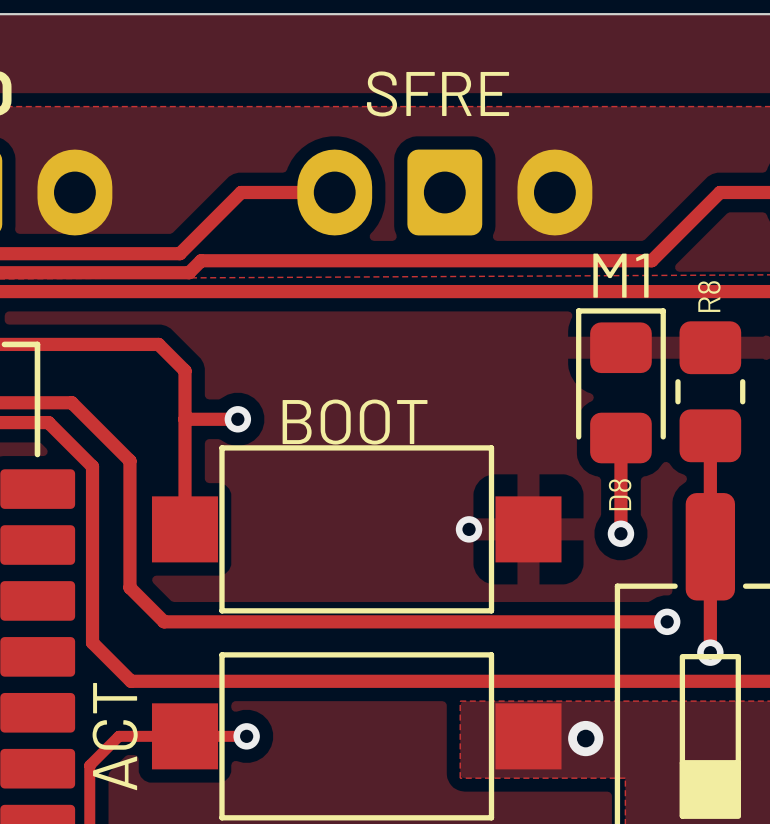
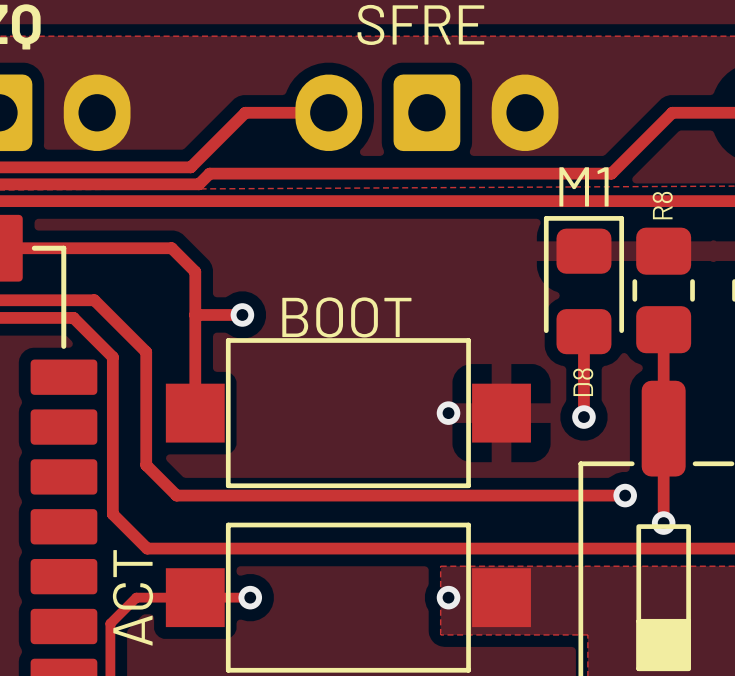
via: none -> (448, 597)
via: (585, 738) -> none

